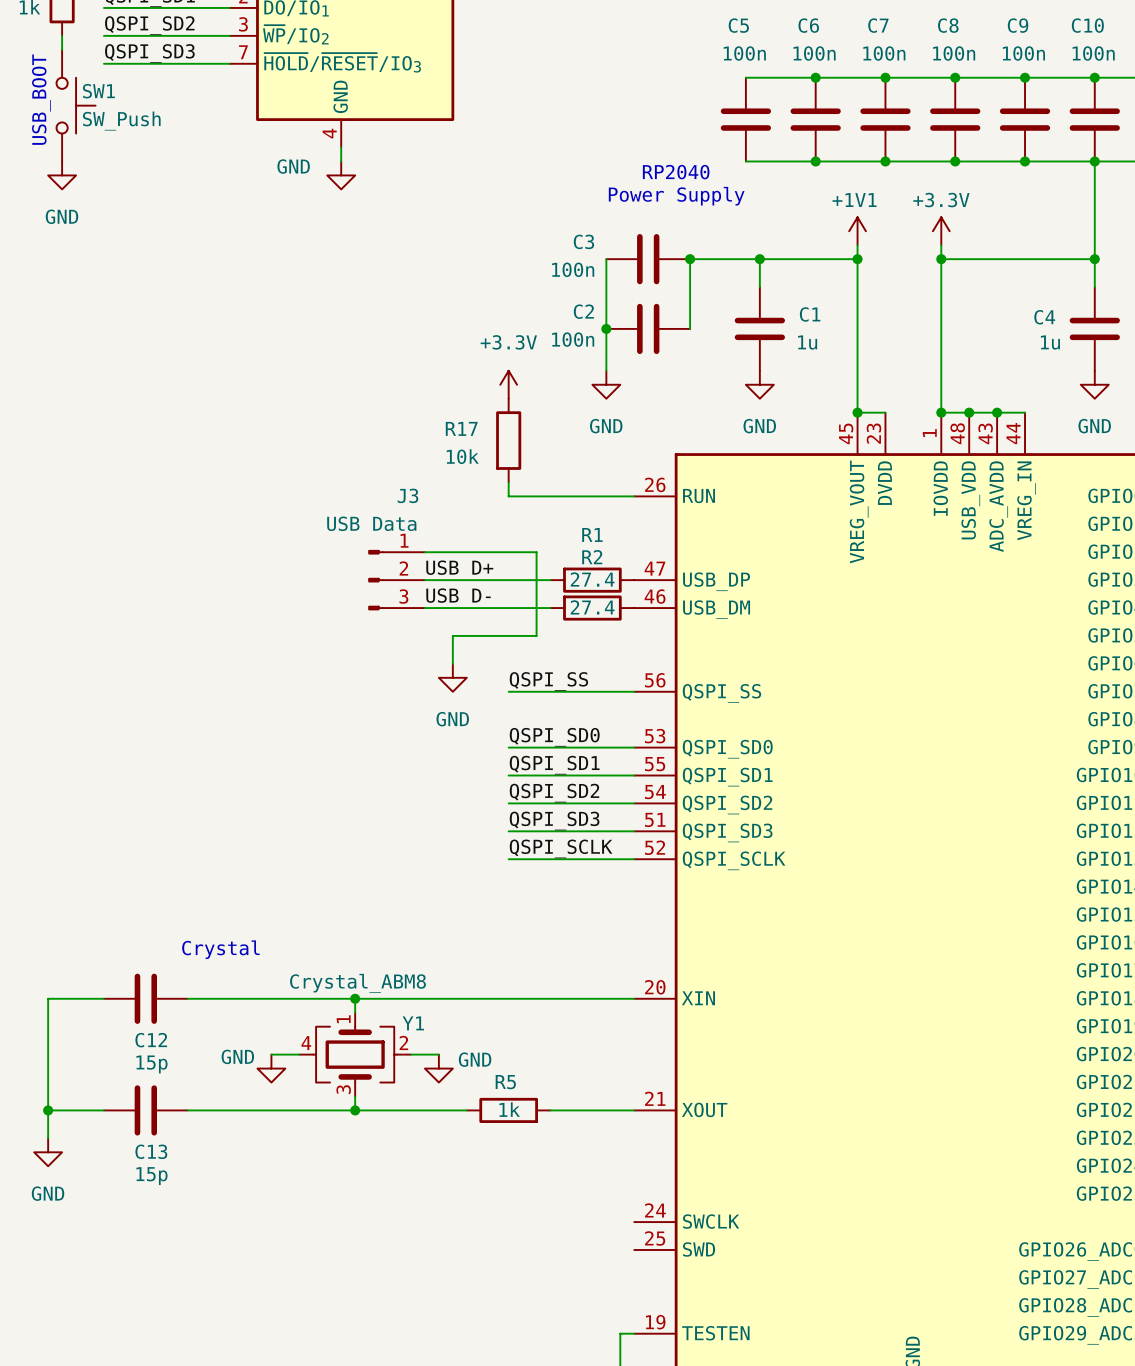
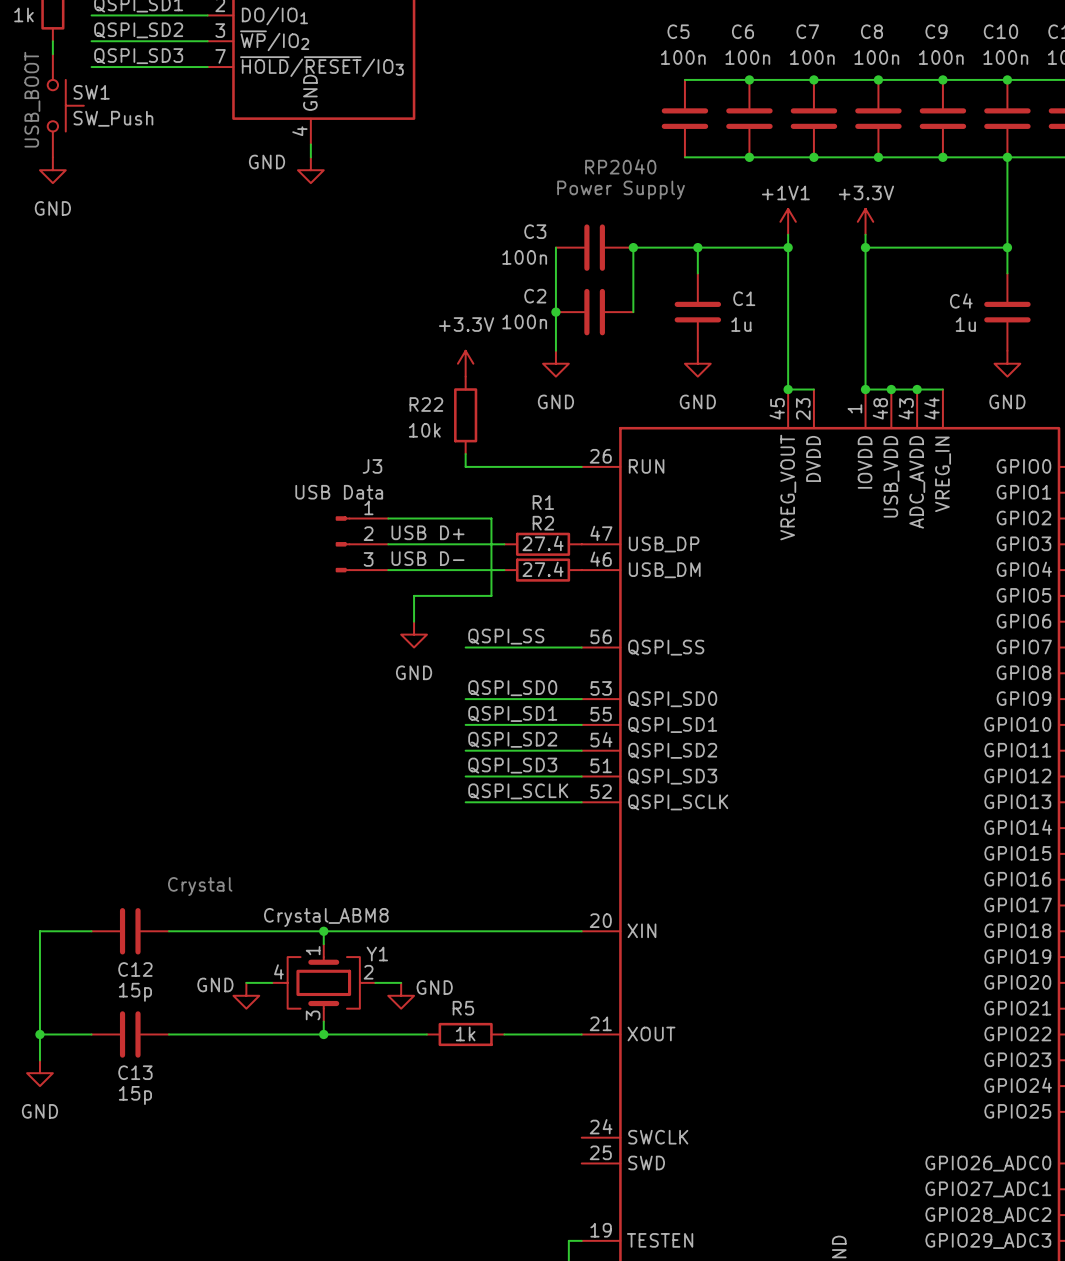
R17 name: R17 (461, 428) -> R22 (426, 404)

